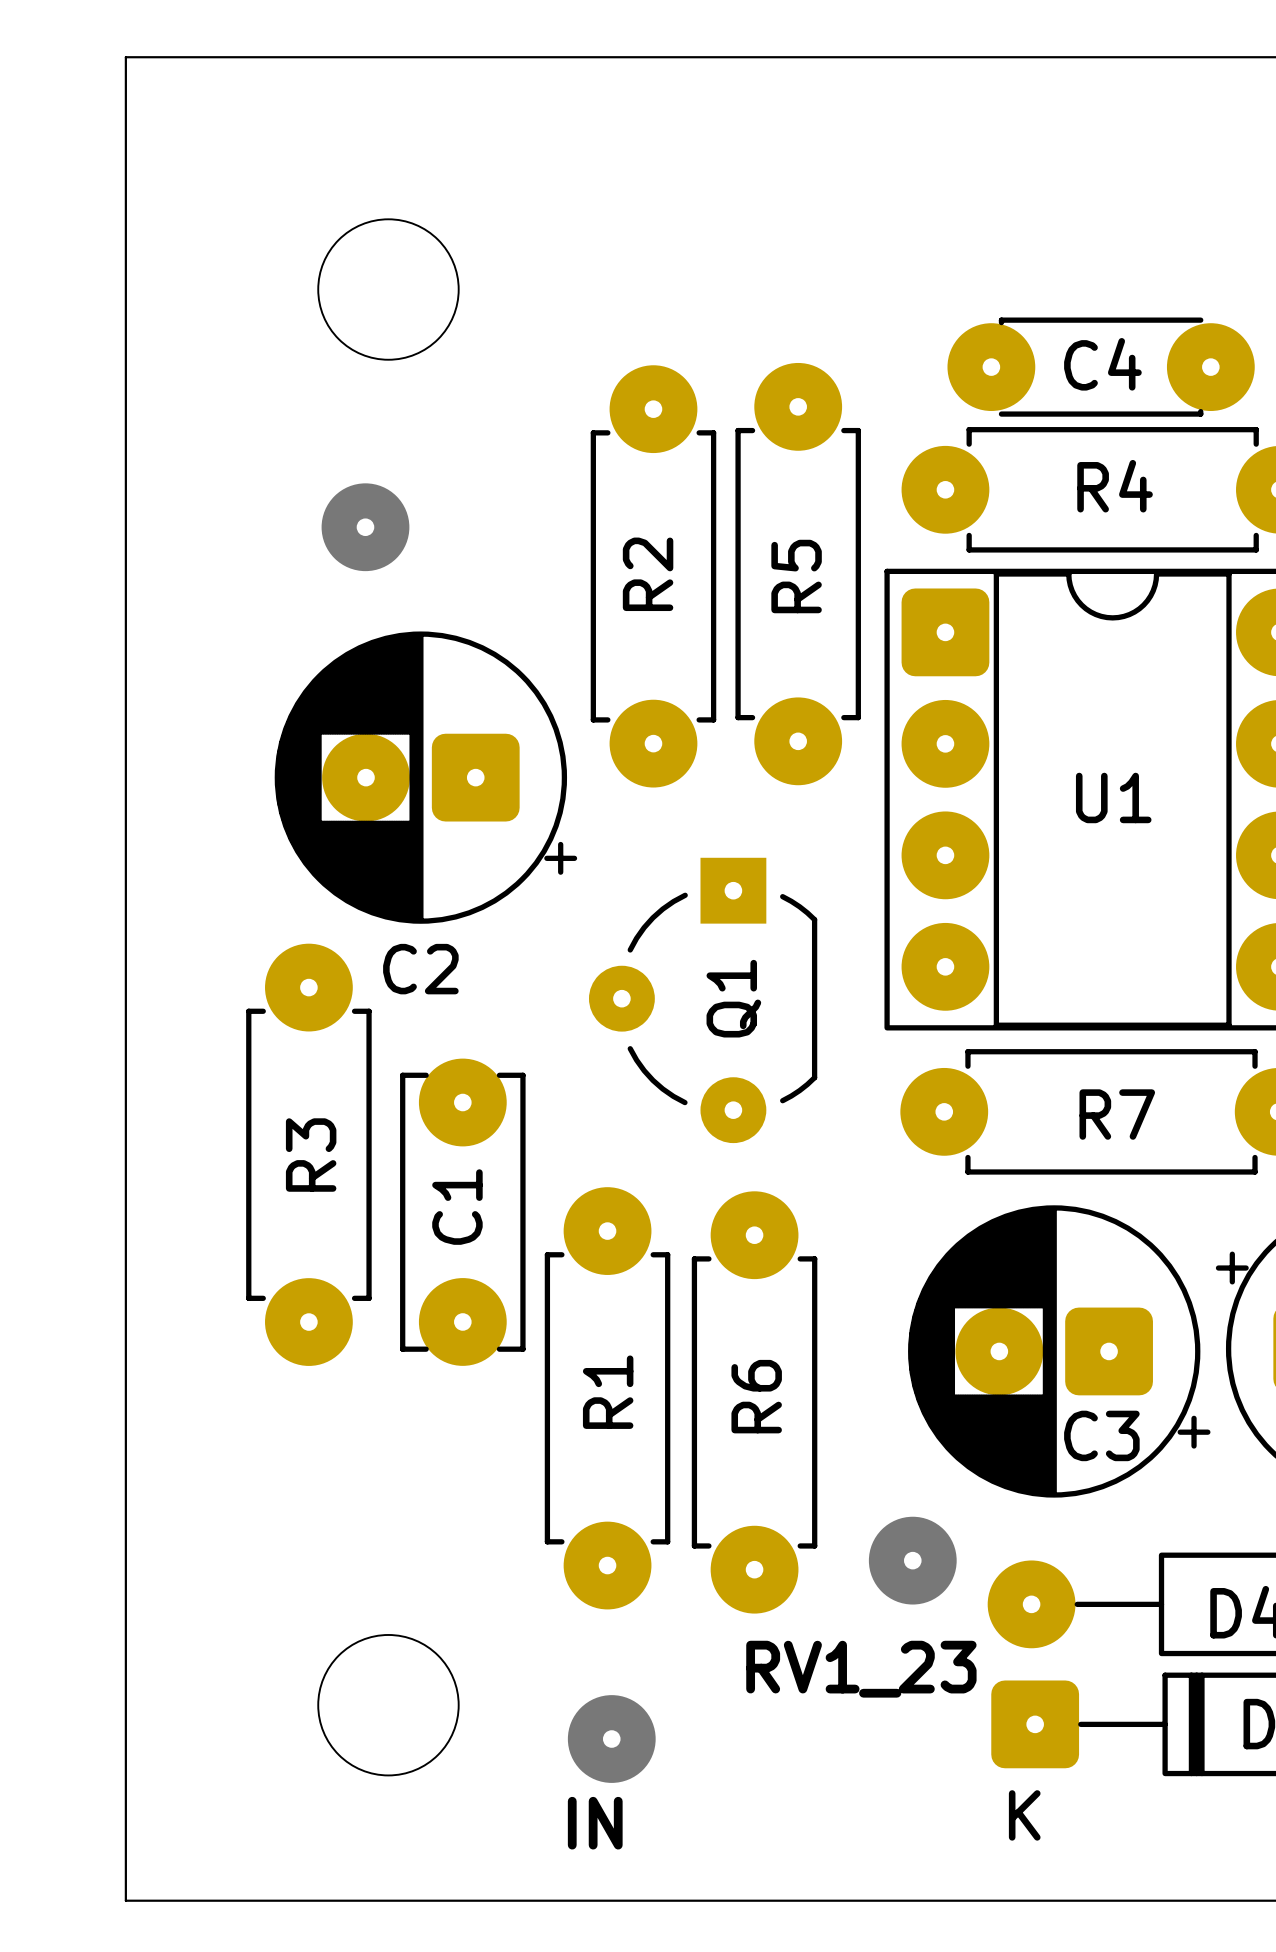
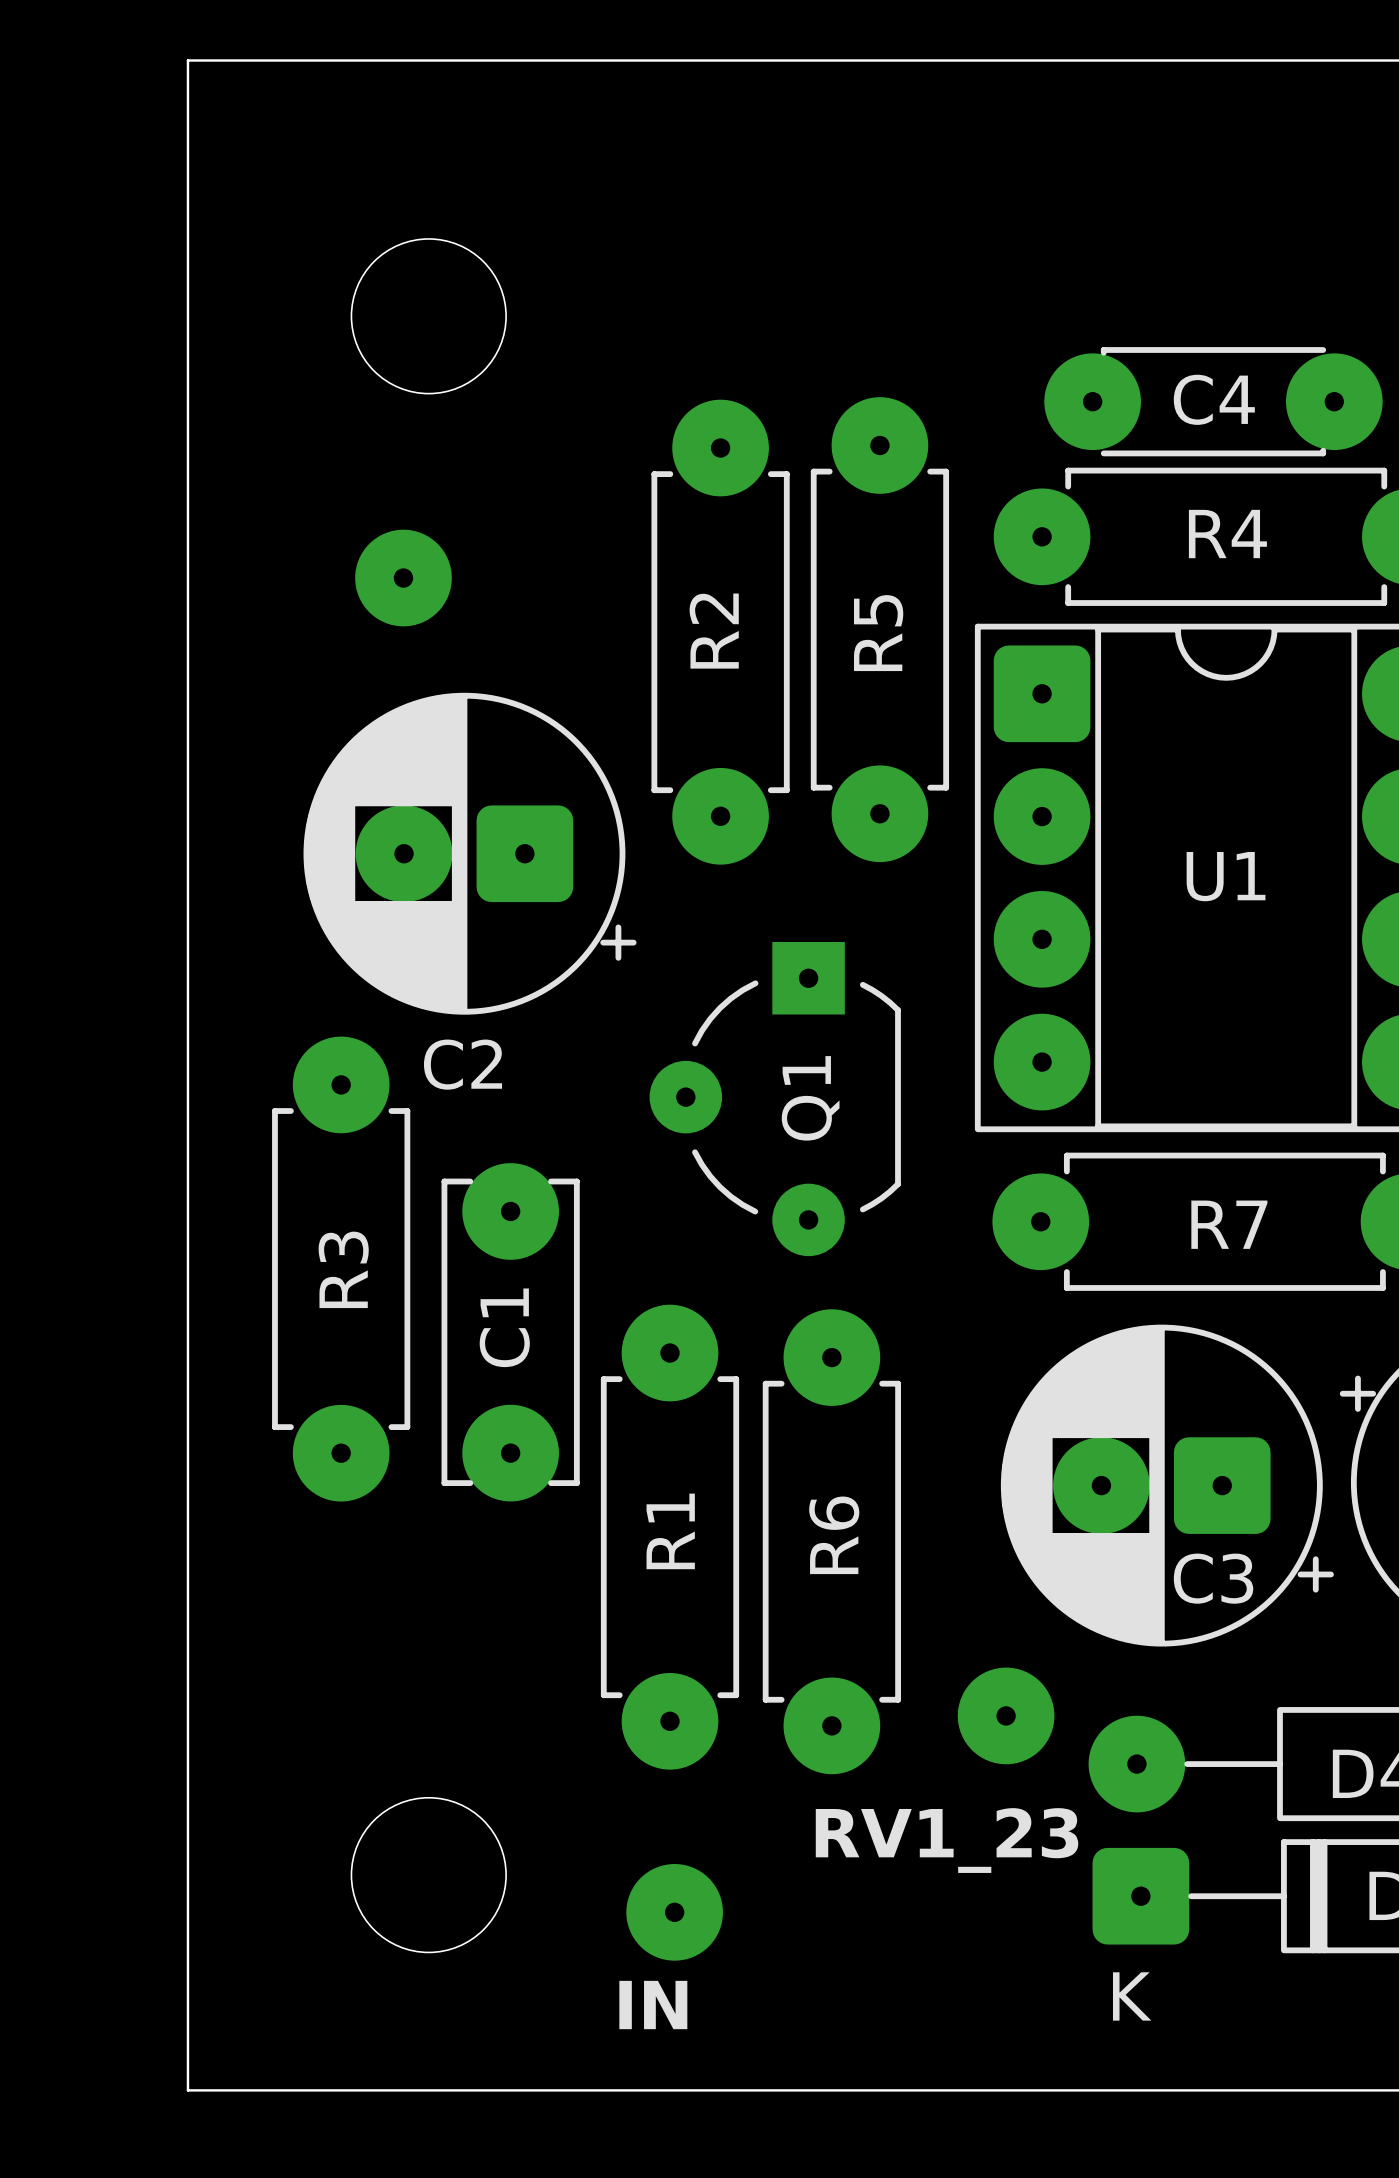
board edge: (169, 57) (125, 57) (125, 1900) (169, 1900) -> (187, 60) (187, 2090)

